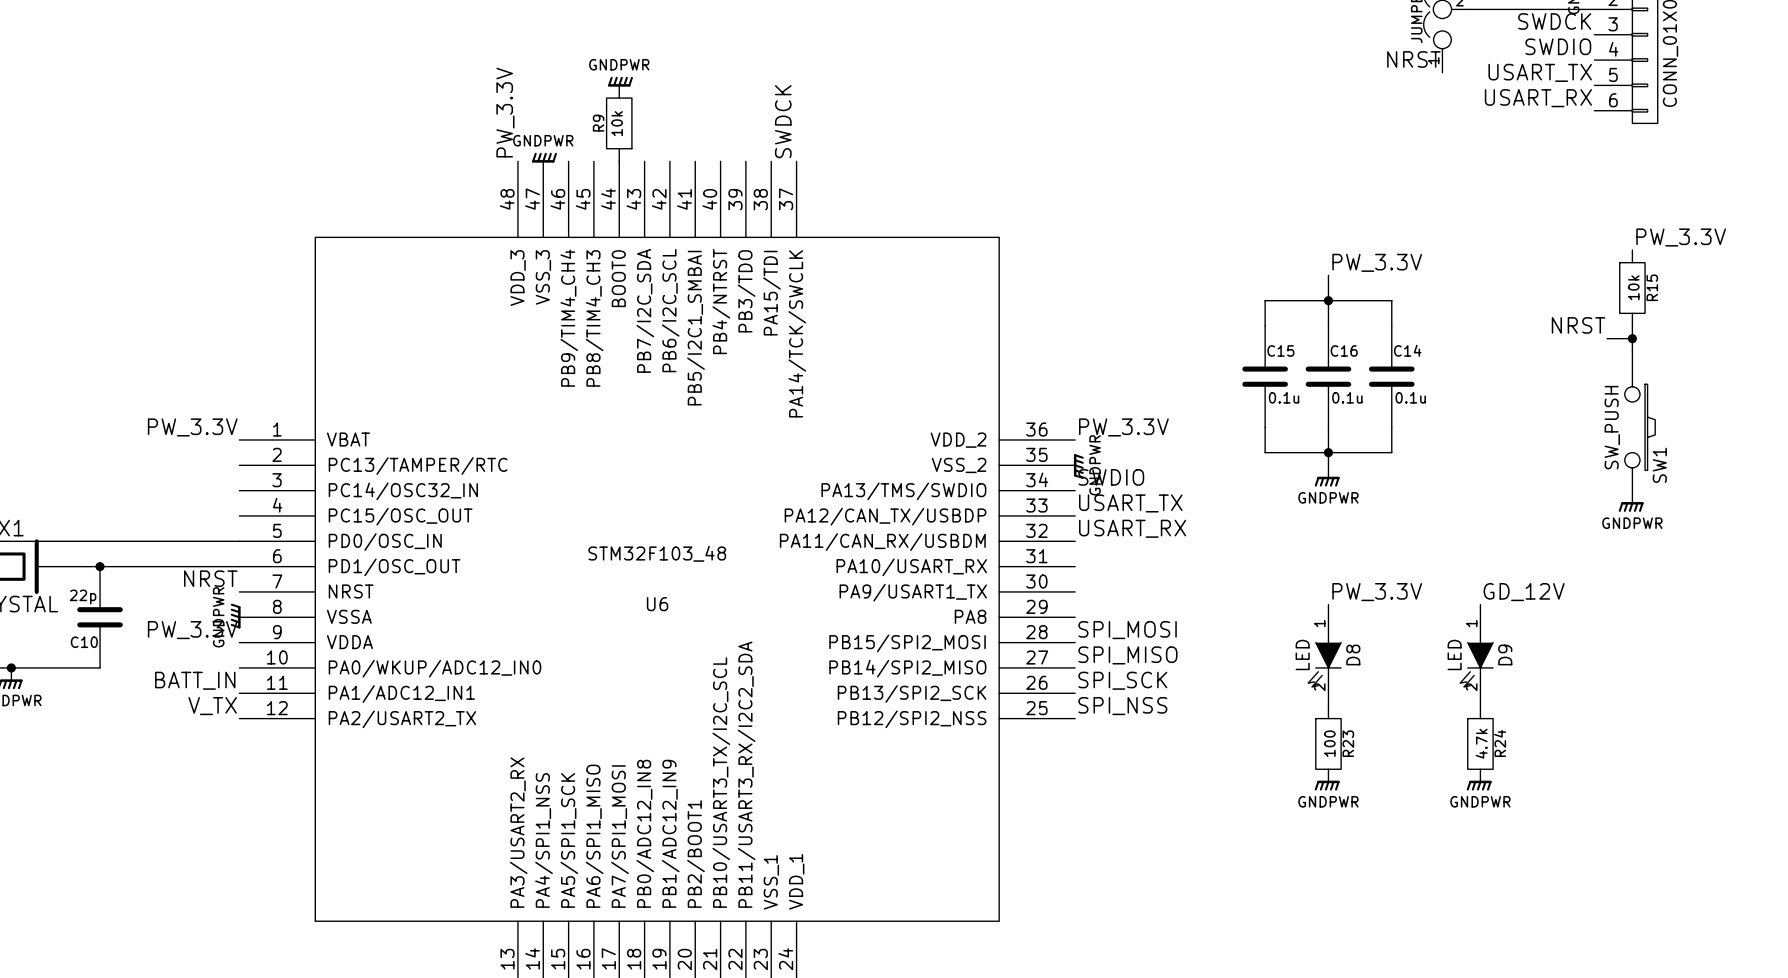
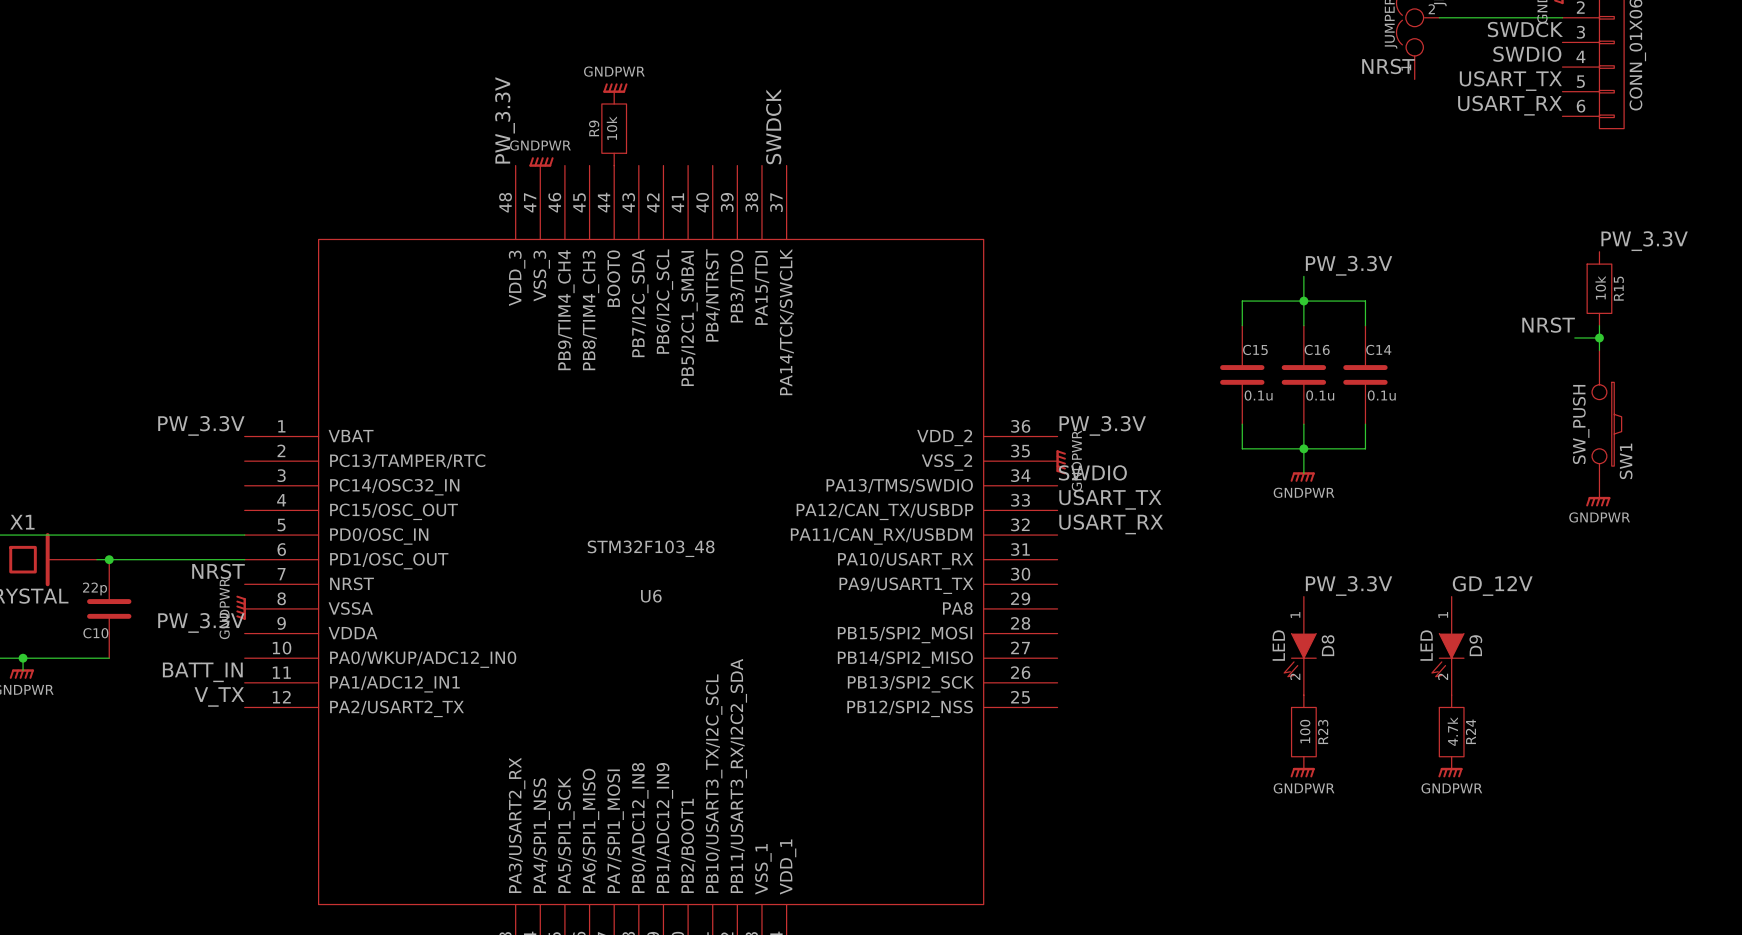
label: SPI_MOSI (1127, 630) -> none
label: SPI_MISO (1127, 655) -> none
label: SPI_SCK (1122, 680) -> none
label: SPI_NSS (1122, 706) -> none

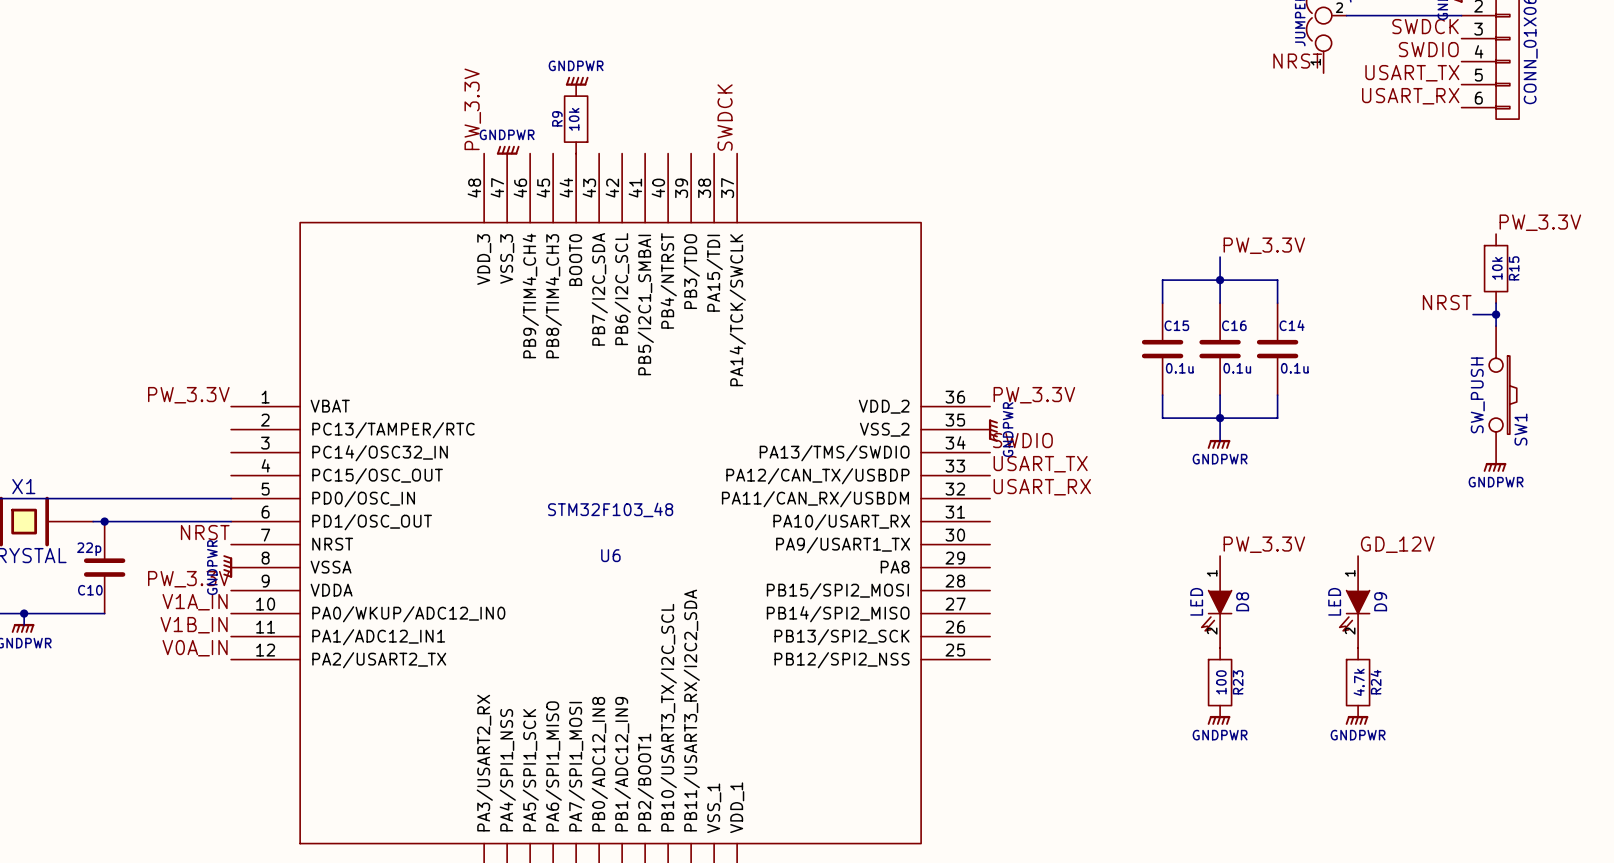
label: none -> V1A_IN (195, 602)
label: BATT_IN (202, 672) -> V1B_IN (194, 625)
label: V_TX (219, 696) -> V0A_IN (195, 648)

